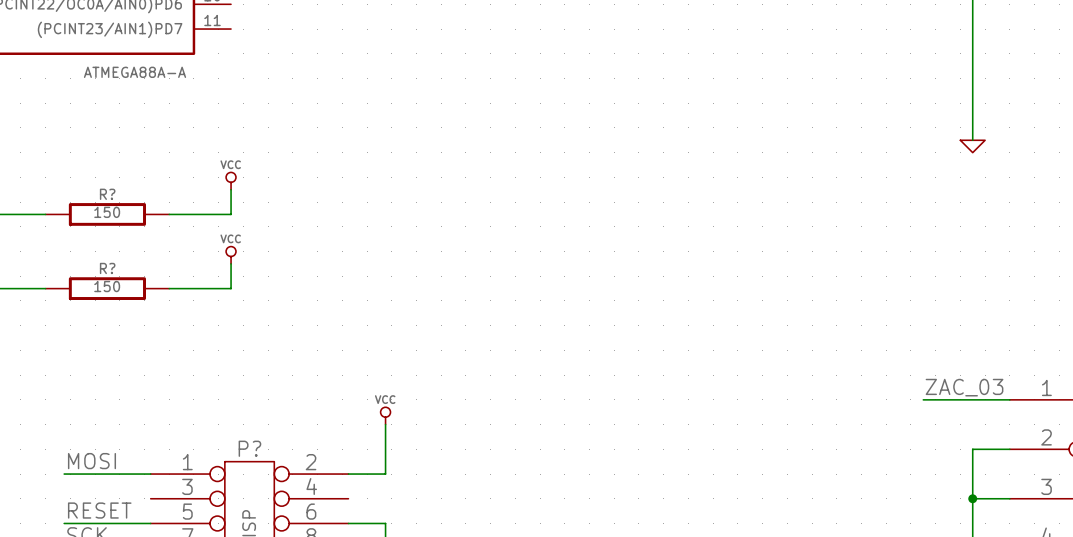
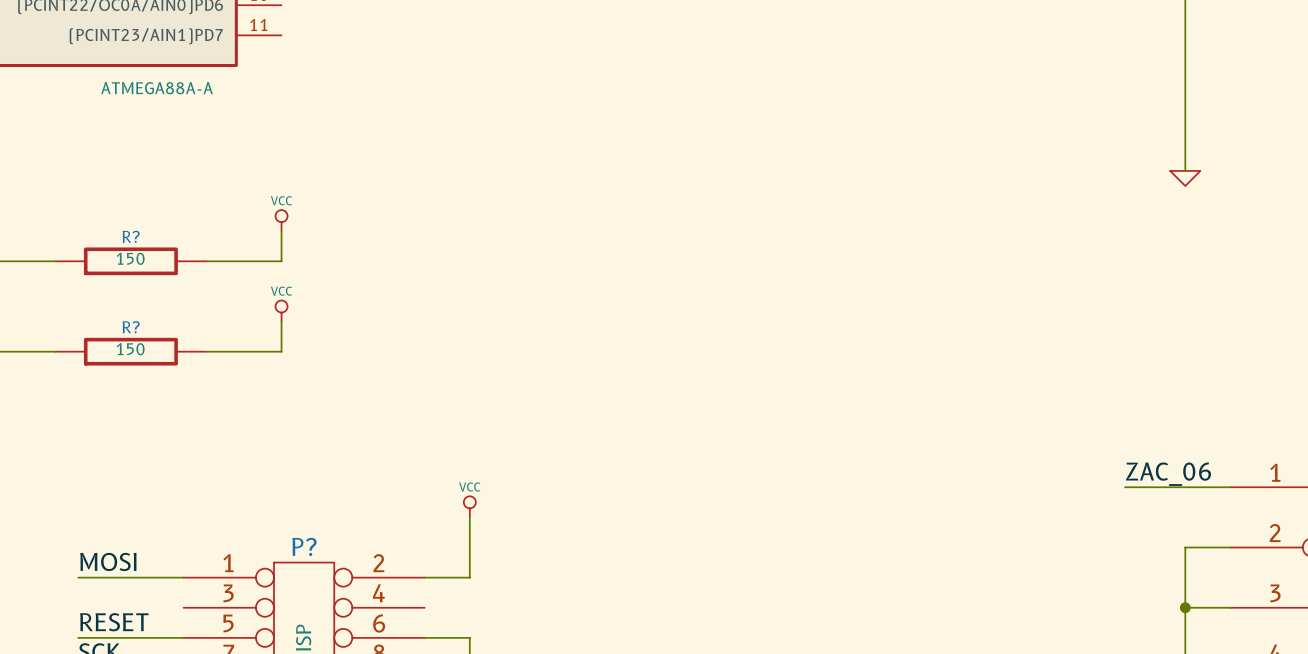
label: ZAC_03 (964, 387) -> ZAC_06 (1168, 474)

